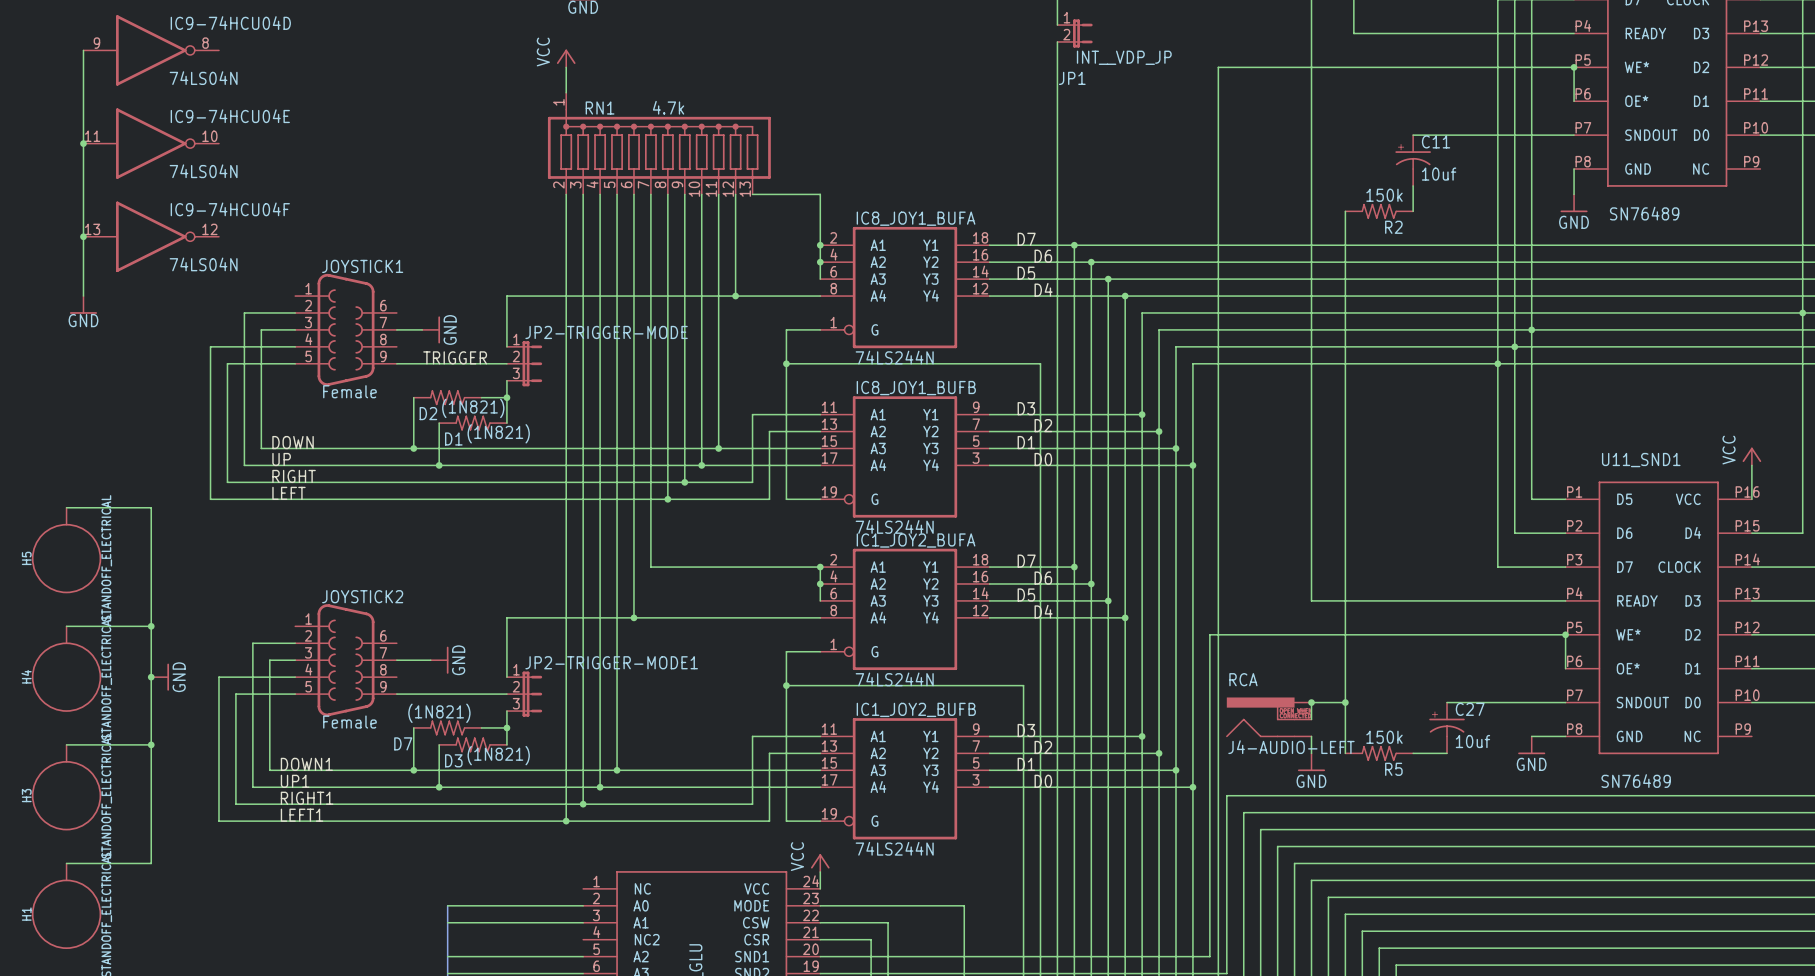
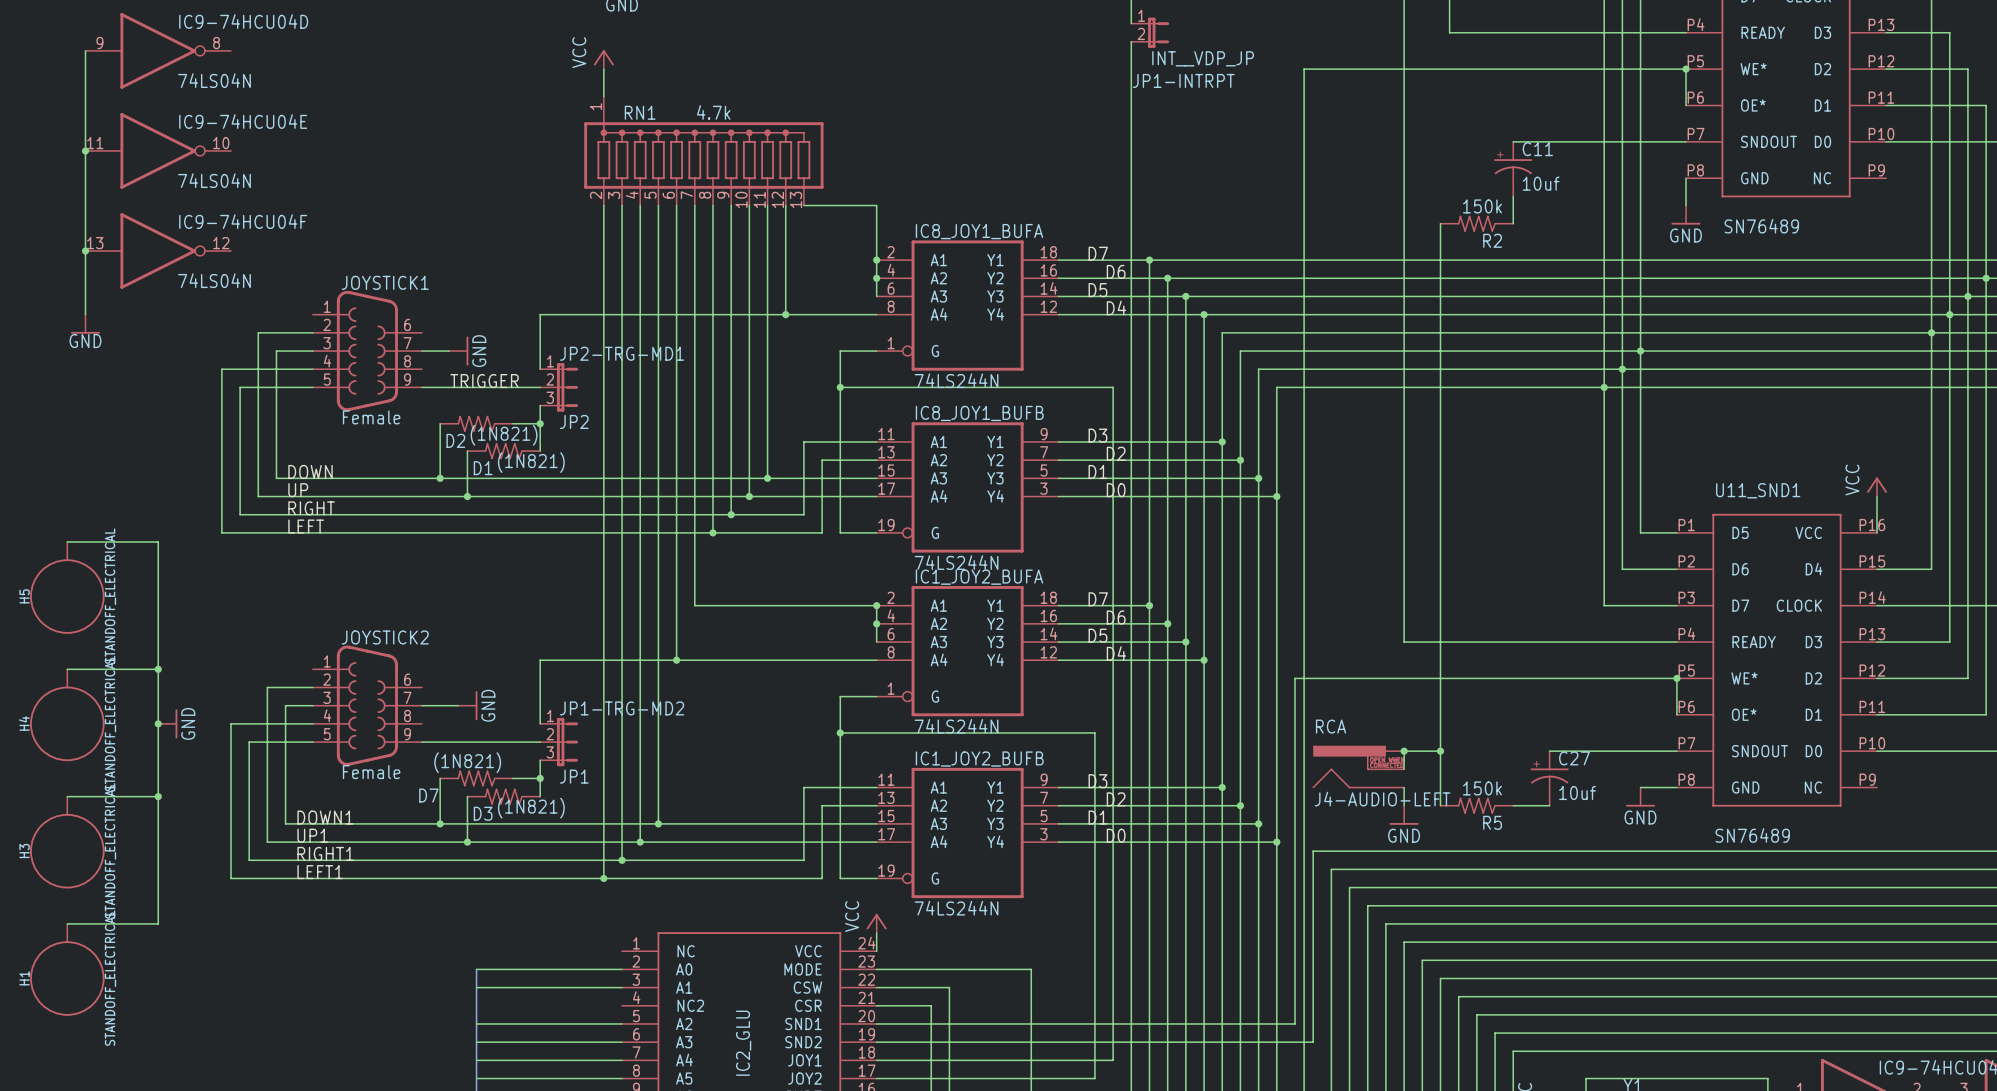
JP1 name: JP1 (1072, 78) -> JP1-INTRPT (1183, 80)
JP2-TRIGGER-MODE name: JP2-TRIGGER-MODE (606, 332) -> JP2-TRG-MD1 (622, 353)
JP2-TRIGGER-MODE value: none -> JP2 (574, 421)
JP2-TRIGGER-MODE1 name: JP2-TRIGGER-MODE1 (611, 662) -> JP1-TRG-MD2 (622, 708)
JP2-TRIGGER-MODE1 value: none -> JP1 (574, 776)

